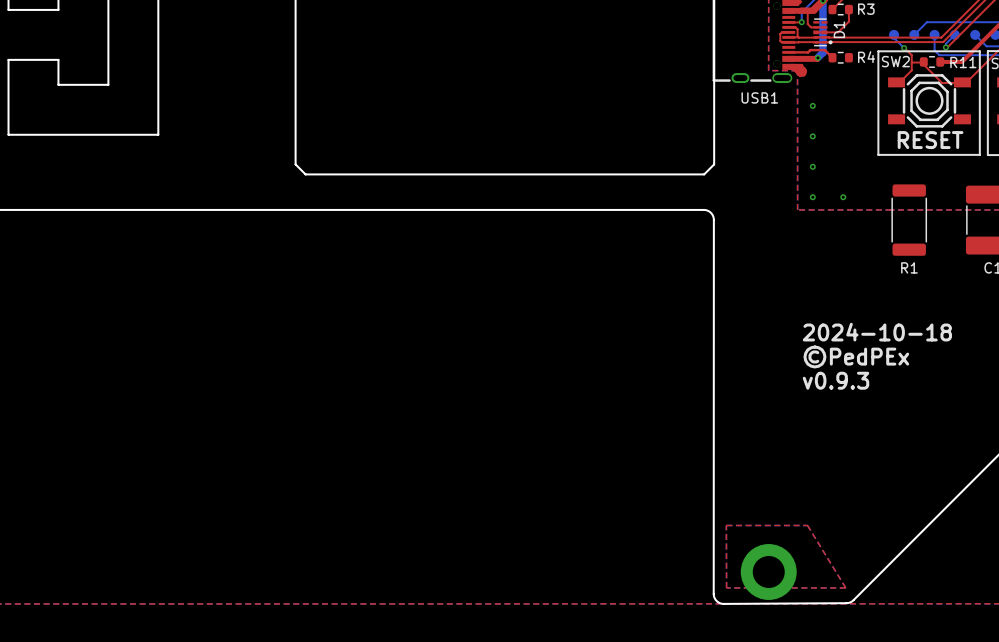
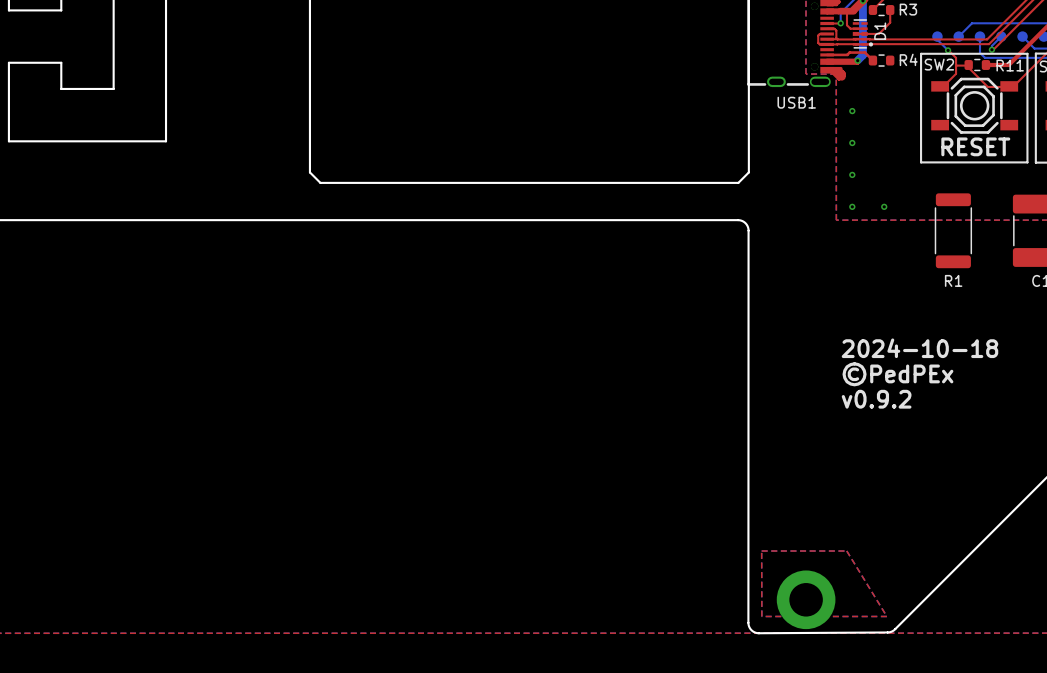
text: v0.9.3 (835, 380) -> v0.9.2 (876, 399)

